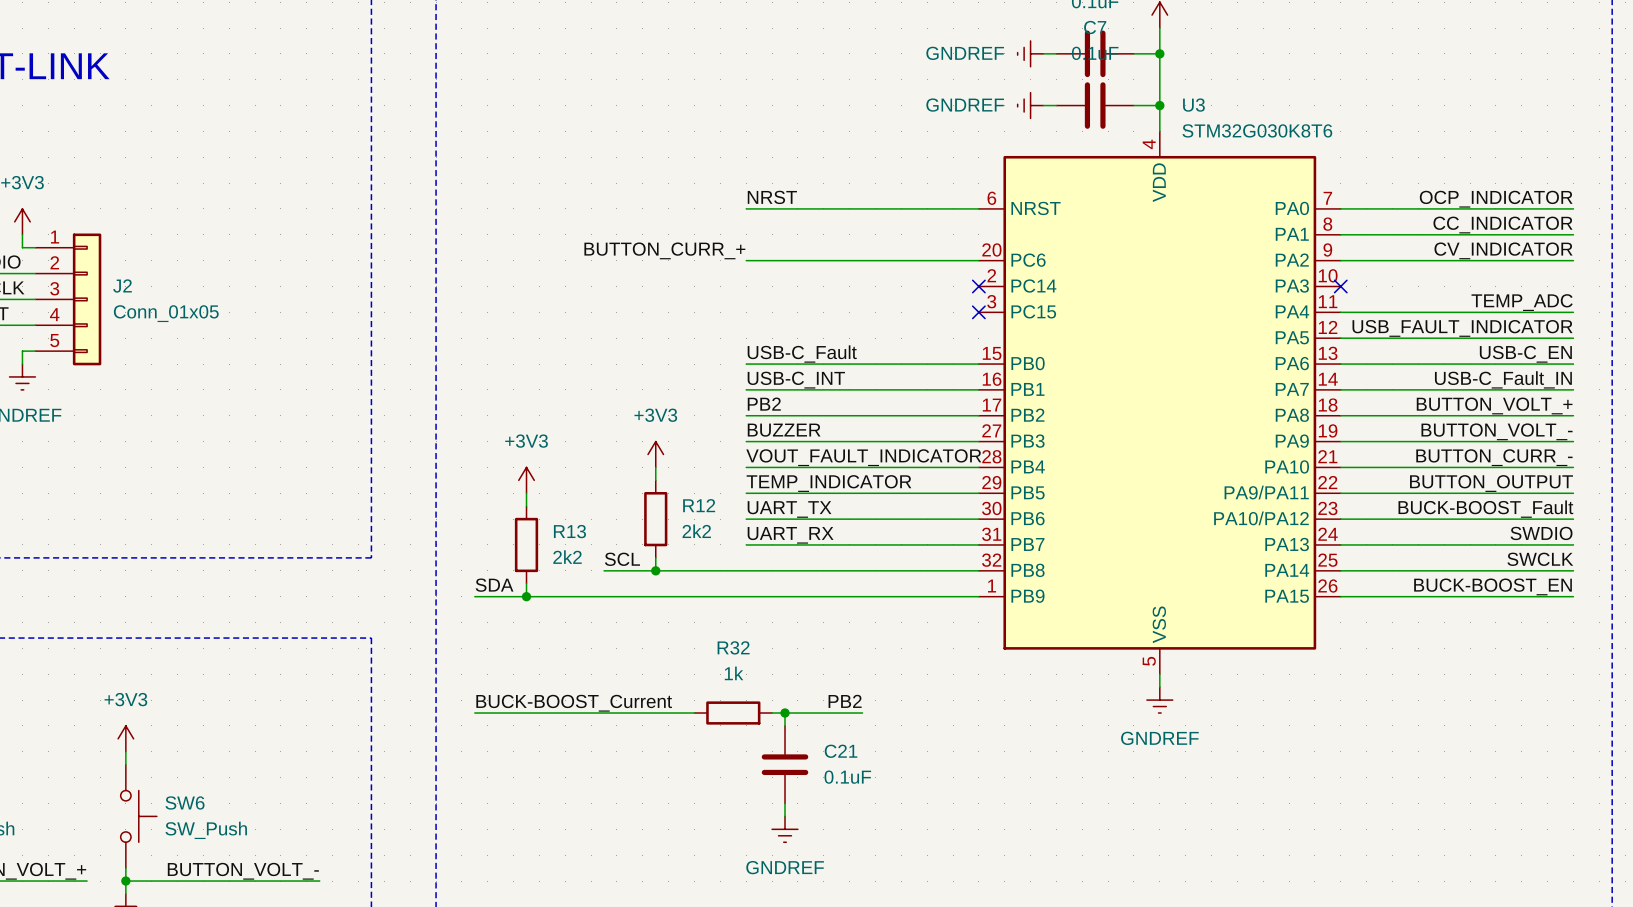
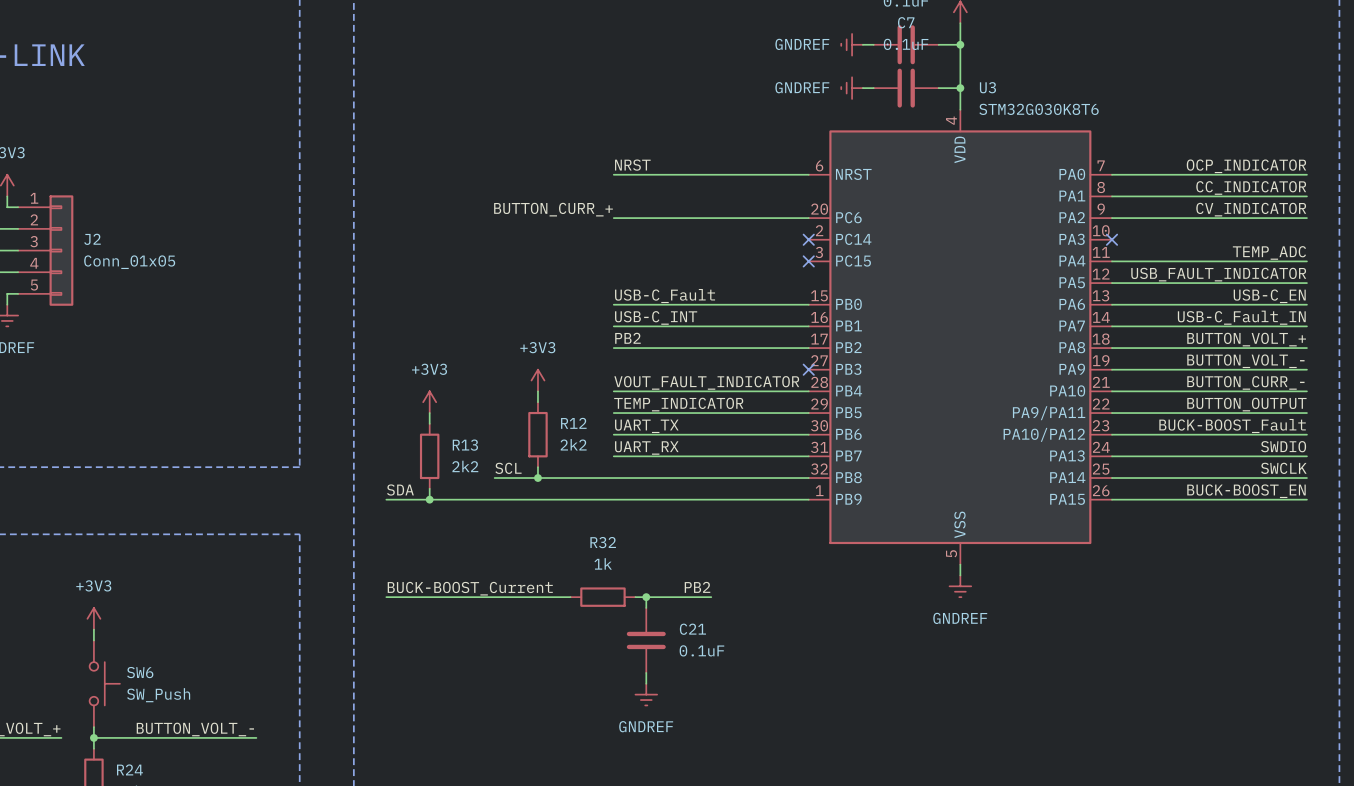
label: BUZZER (784, 430) -> none
wire: (746, 441) (978, 441) -> none
no-connect mark: none -> (808, 369)

